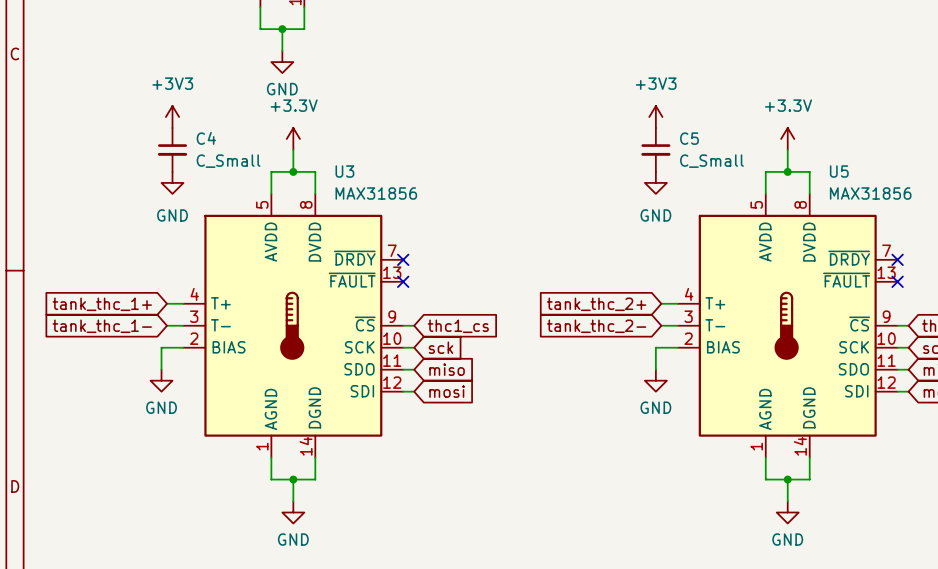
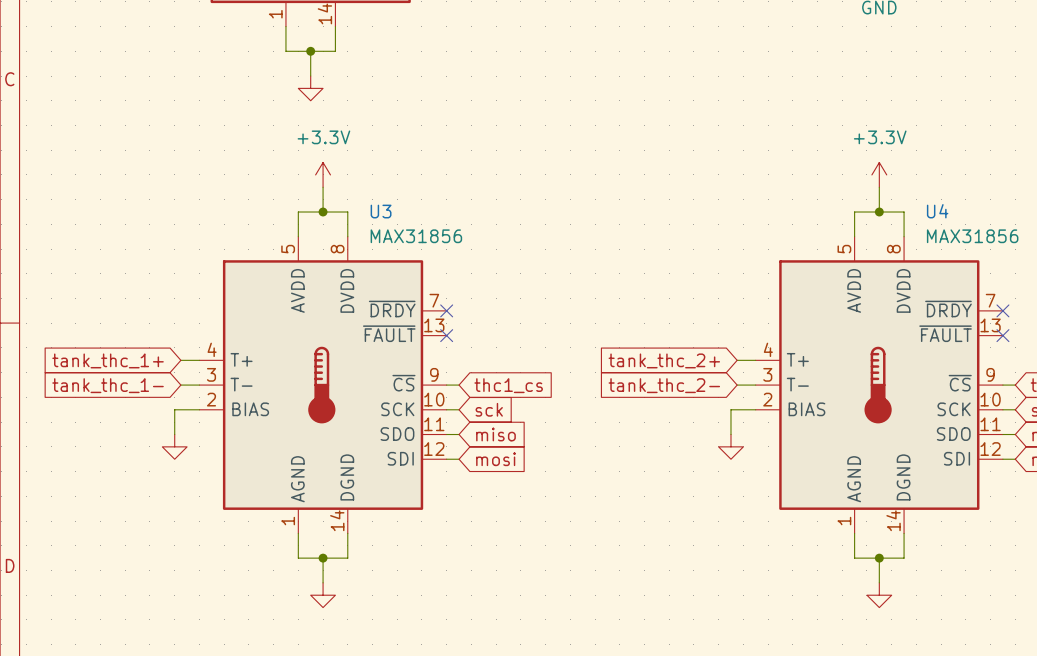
power symbol text: GND (282, 89) -> none
power symbol: +3V3 (172, 117) -> none
power symbol: +3V3 (655, 117) -> none
C4: C_Small (172, 149) -> none
C5: C_Small (655, 149) -> none
U5 name: U5 (839, 171) -> U4 (937, 211)
power symbol: GND (172, 182) -> none
power symbol: GND (655, 182) -> none
power symbol text: GND (161, 407) -> none
power symbol text: GND (655, 407) -> none
power symbol text: GND (293, 539) -> none
power symbol text: GND (787, 539) -> none

